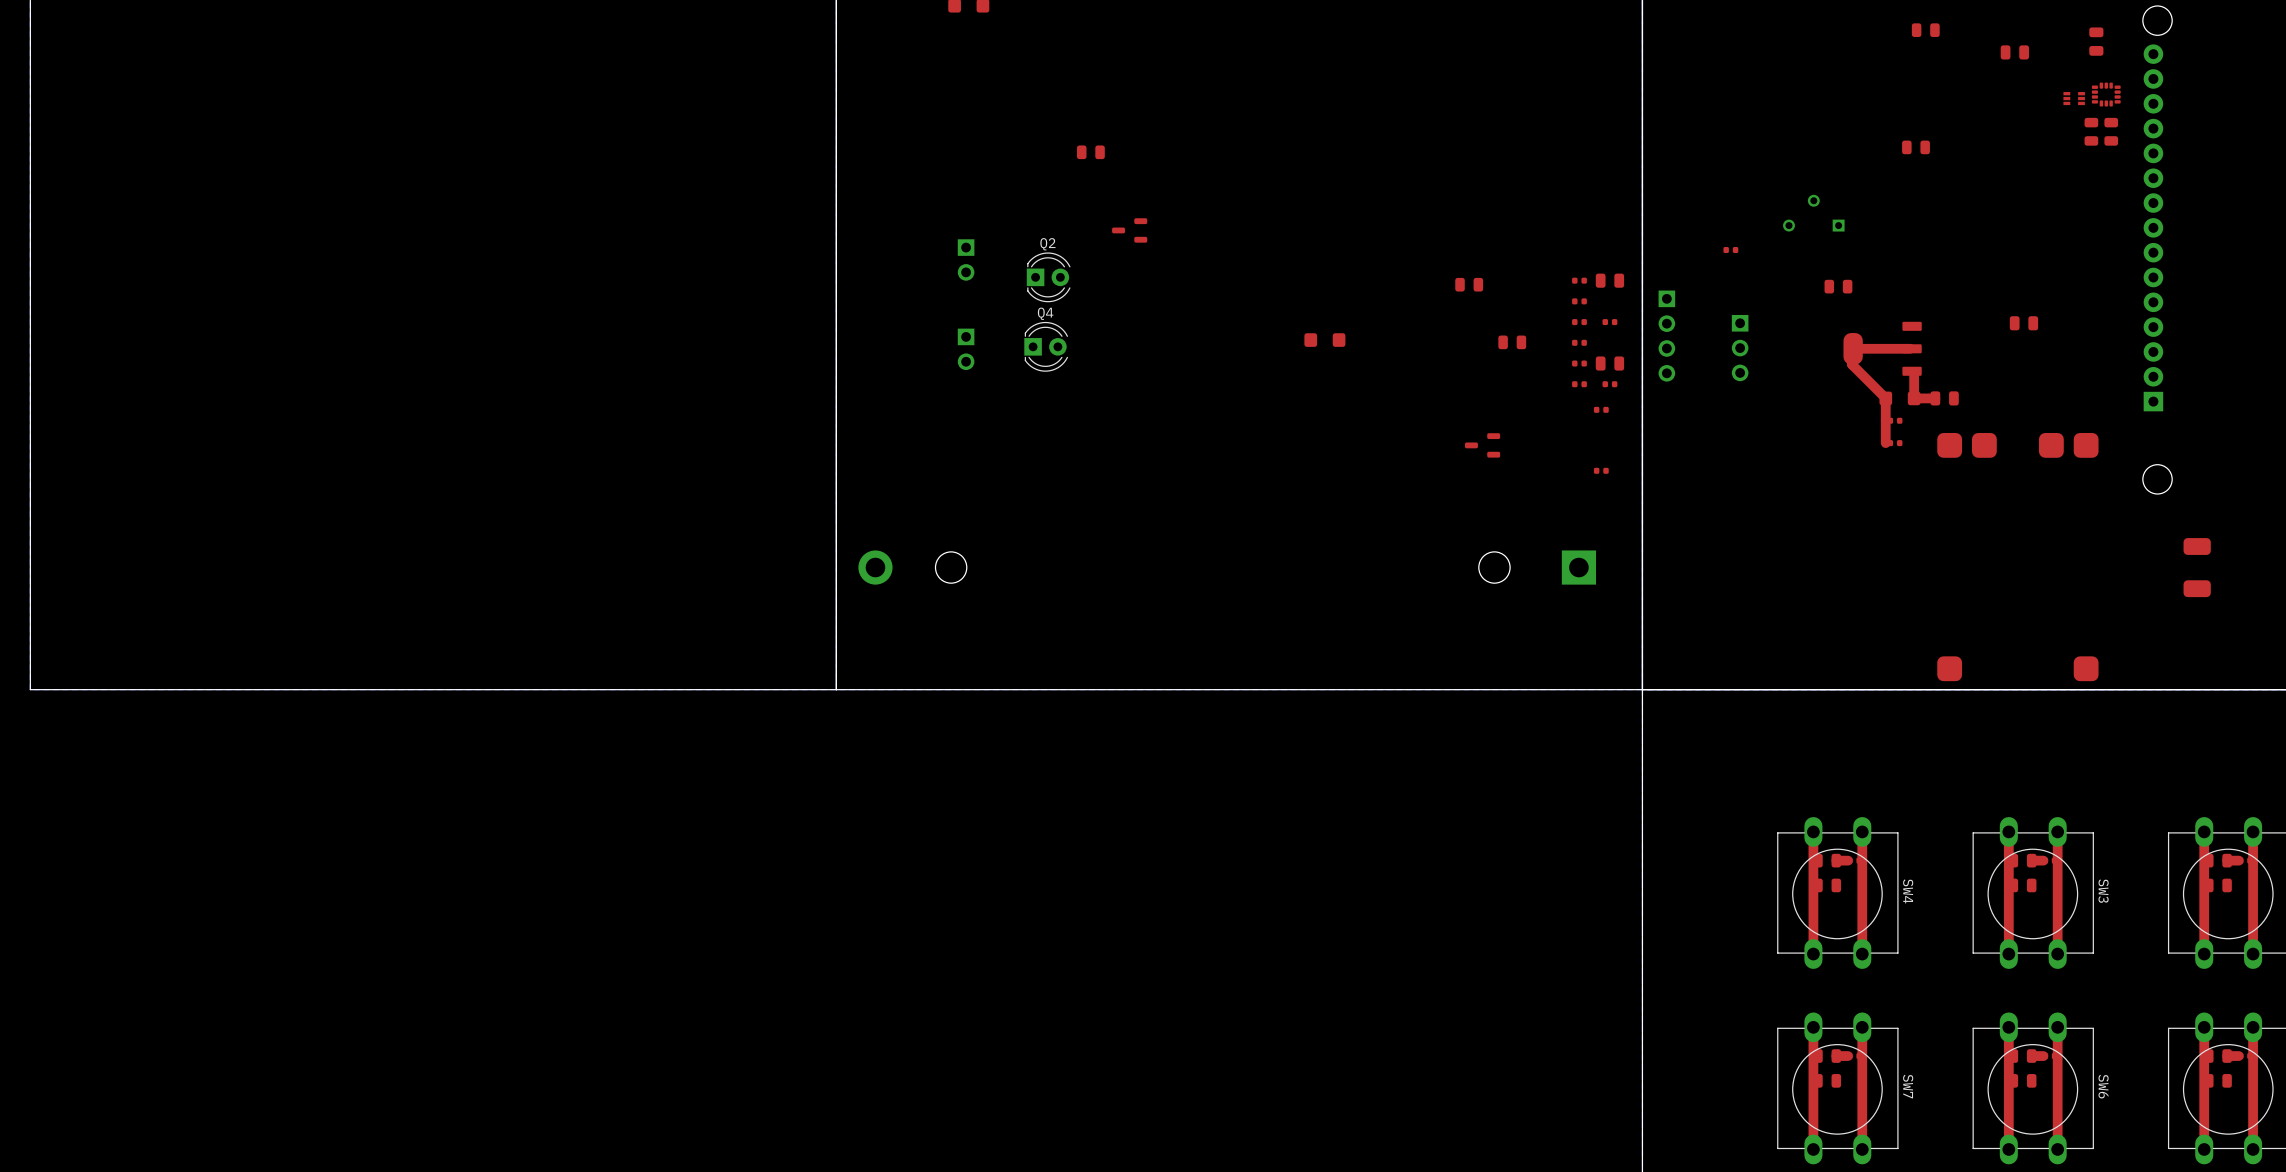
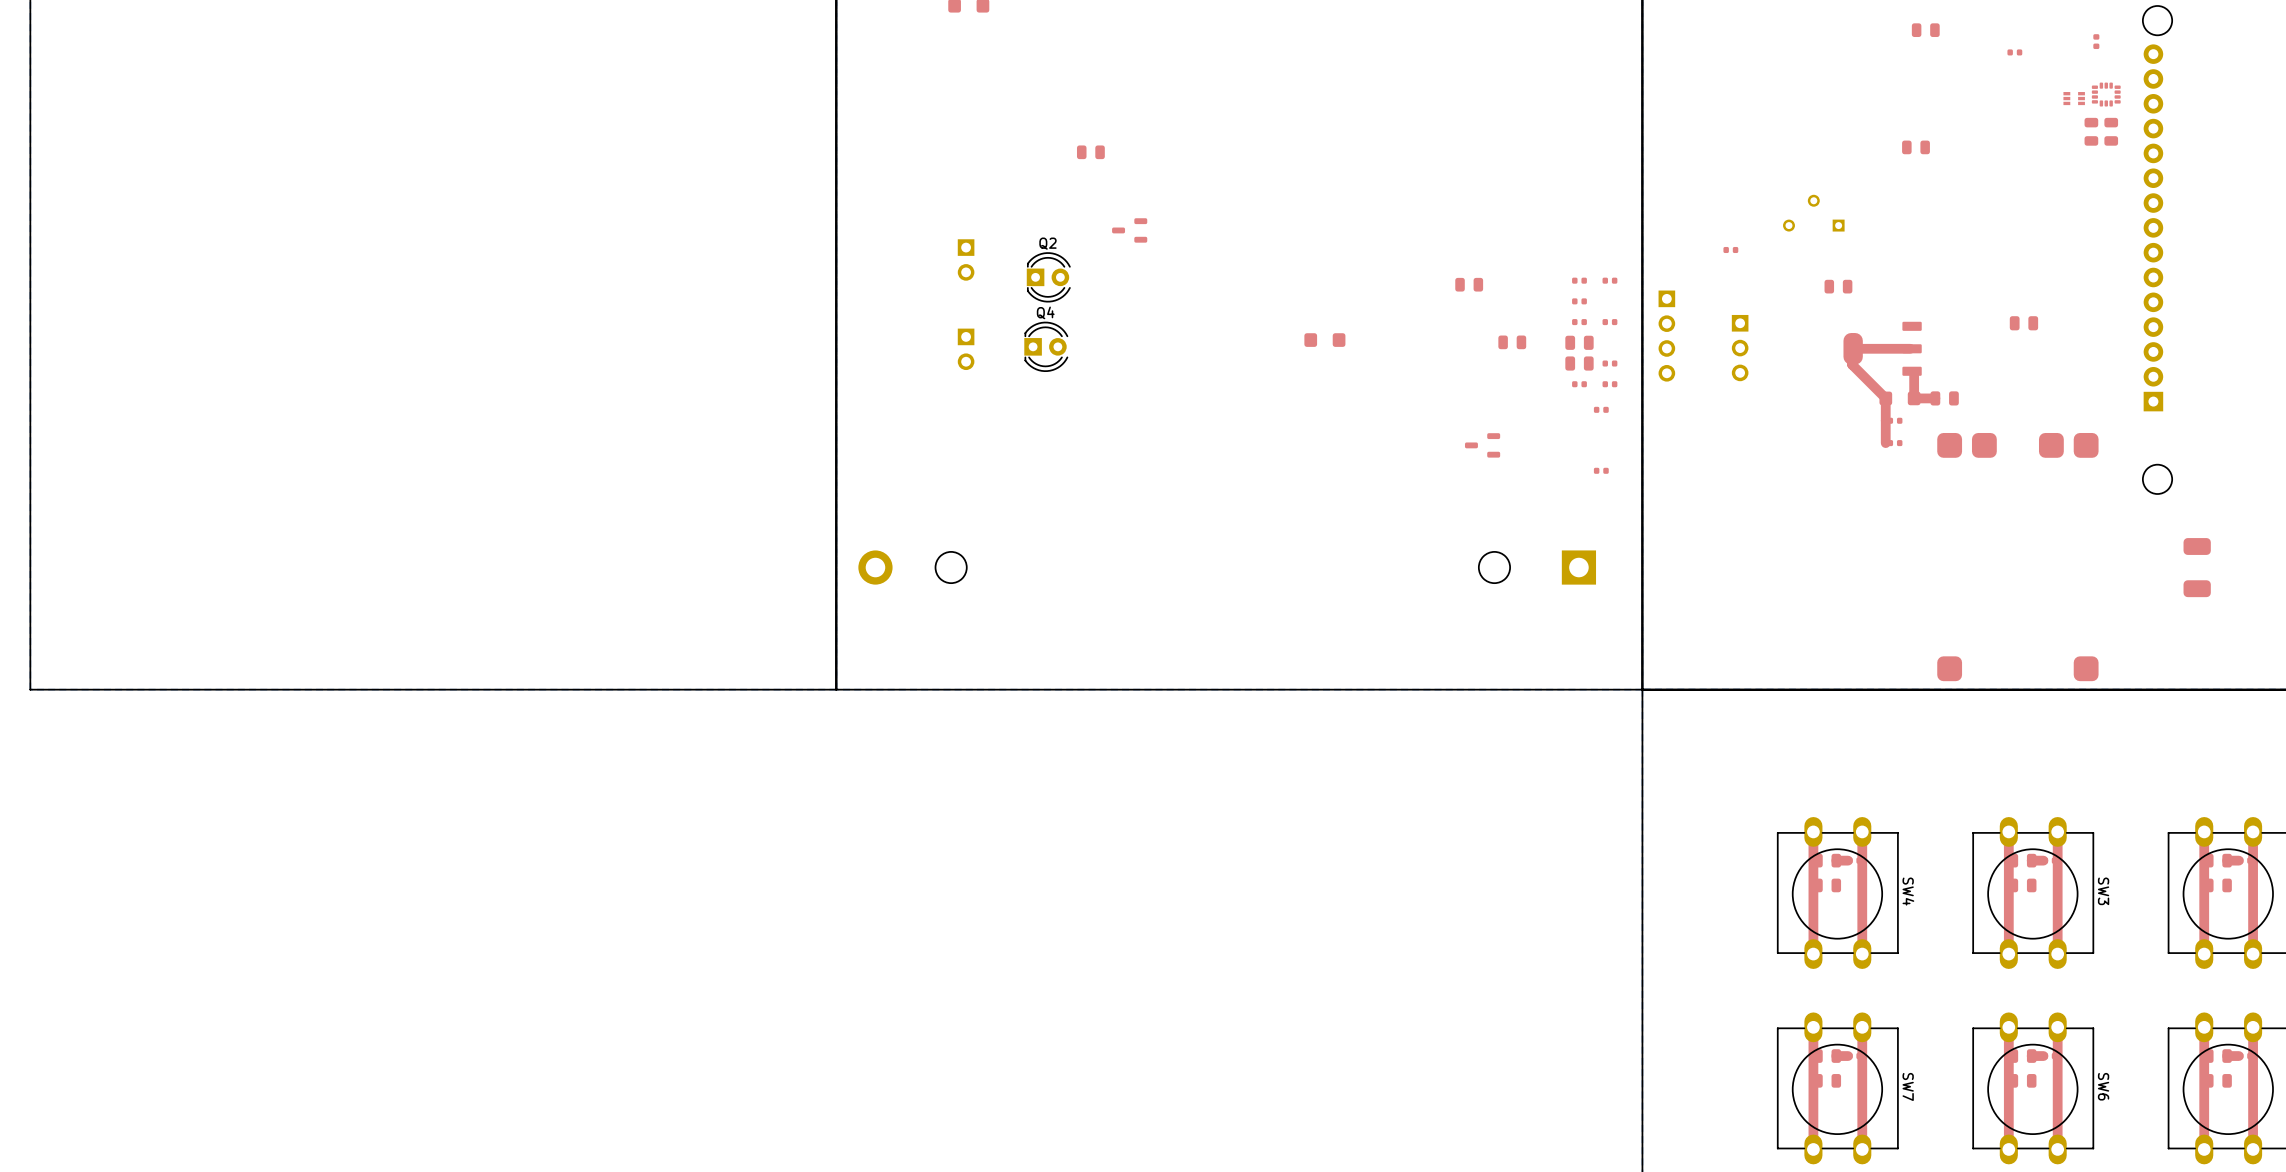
part footprint: [2089, 27, 2104, 56] -> [2093, 34, 2100, 50]
part footprint: [2000, 45, 2030, 60] -> [2007, 49, 2023, 56]
part footprint: [1595, 273, 1625, 288] -> [1602, 277, 1618, 284]
part footprint: [1572, 339, 1587, 346] -> [1565, 335, 1594, 350]
part footprint: [1595, 356, 1625, 371] -> [1602, 360, 1618, 367]
part footprint: [1572, 360, 1587, 367] -> [1565, 356, 1594, 371]

